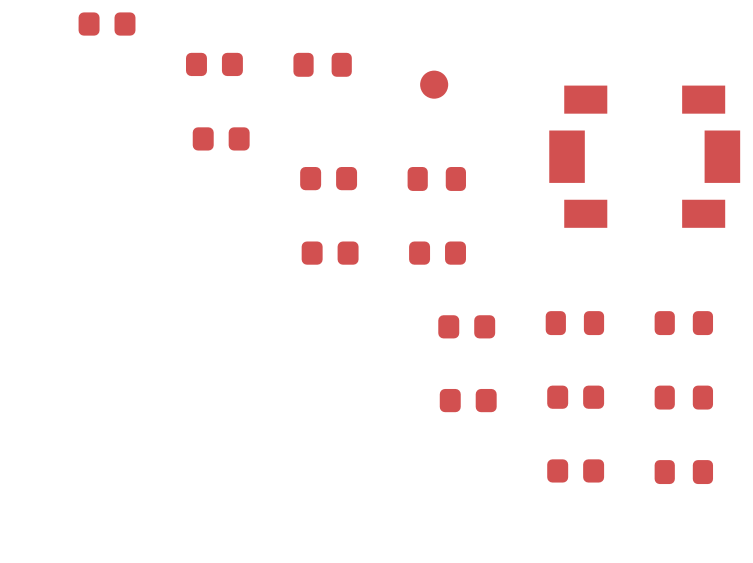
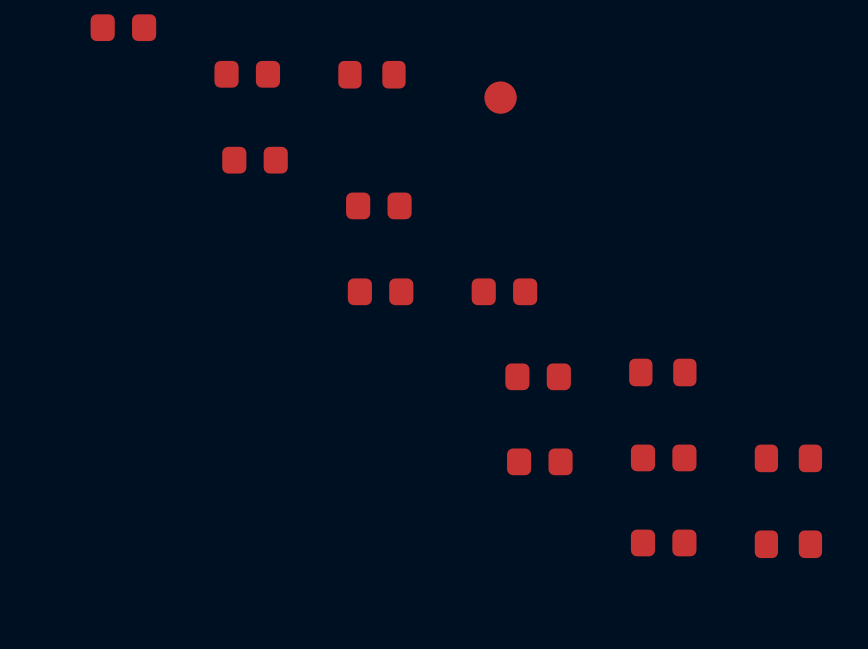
part: (644, 156) -> none
part: (436, 178) -> none
part: (683, 323) -> none

